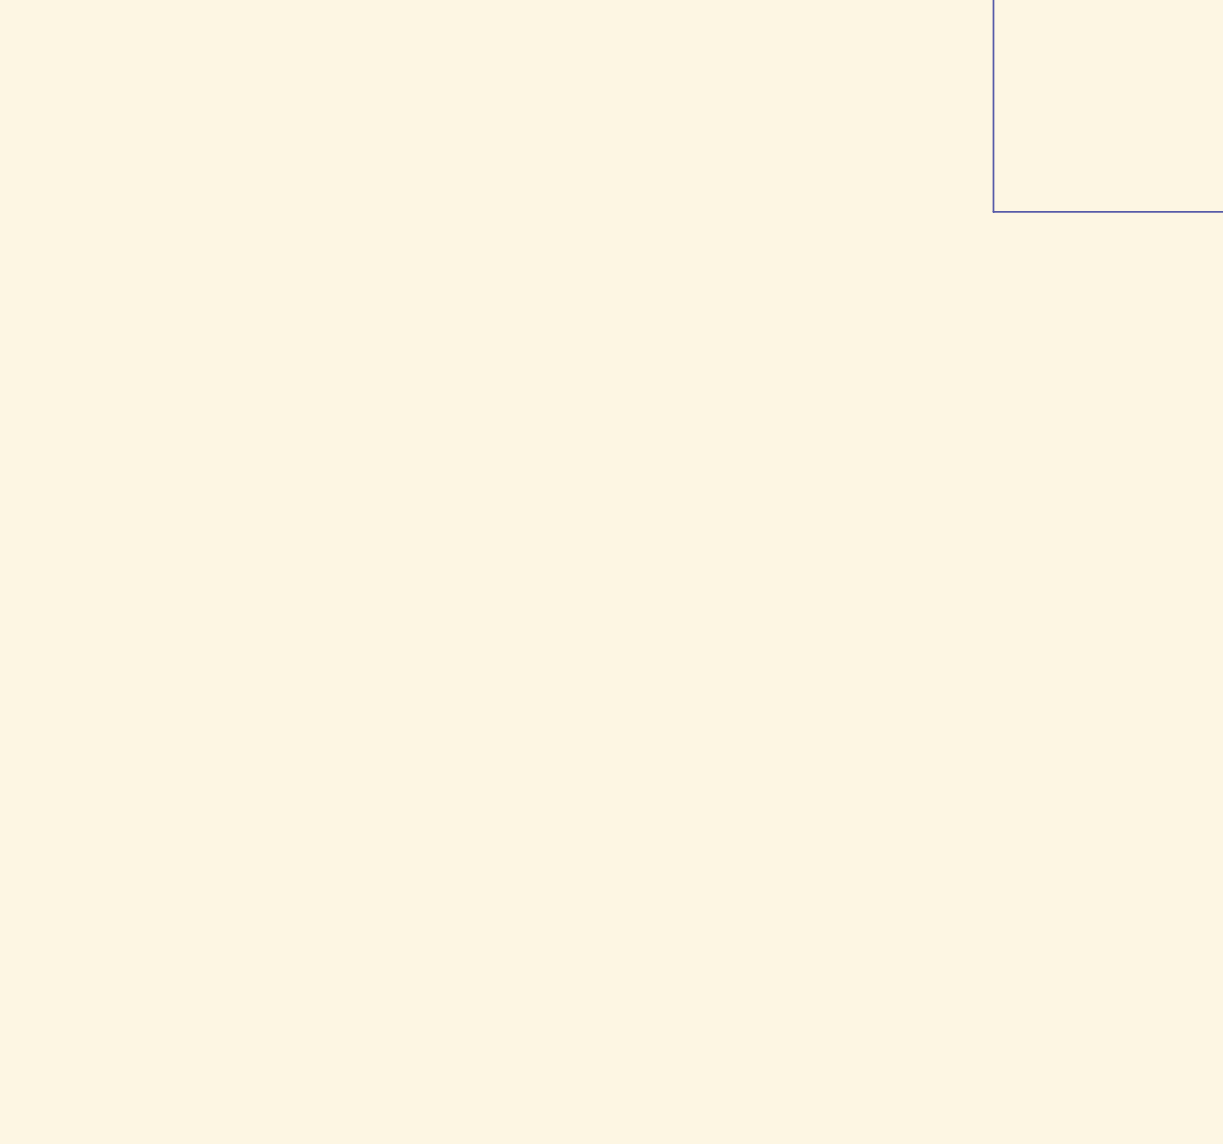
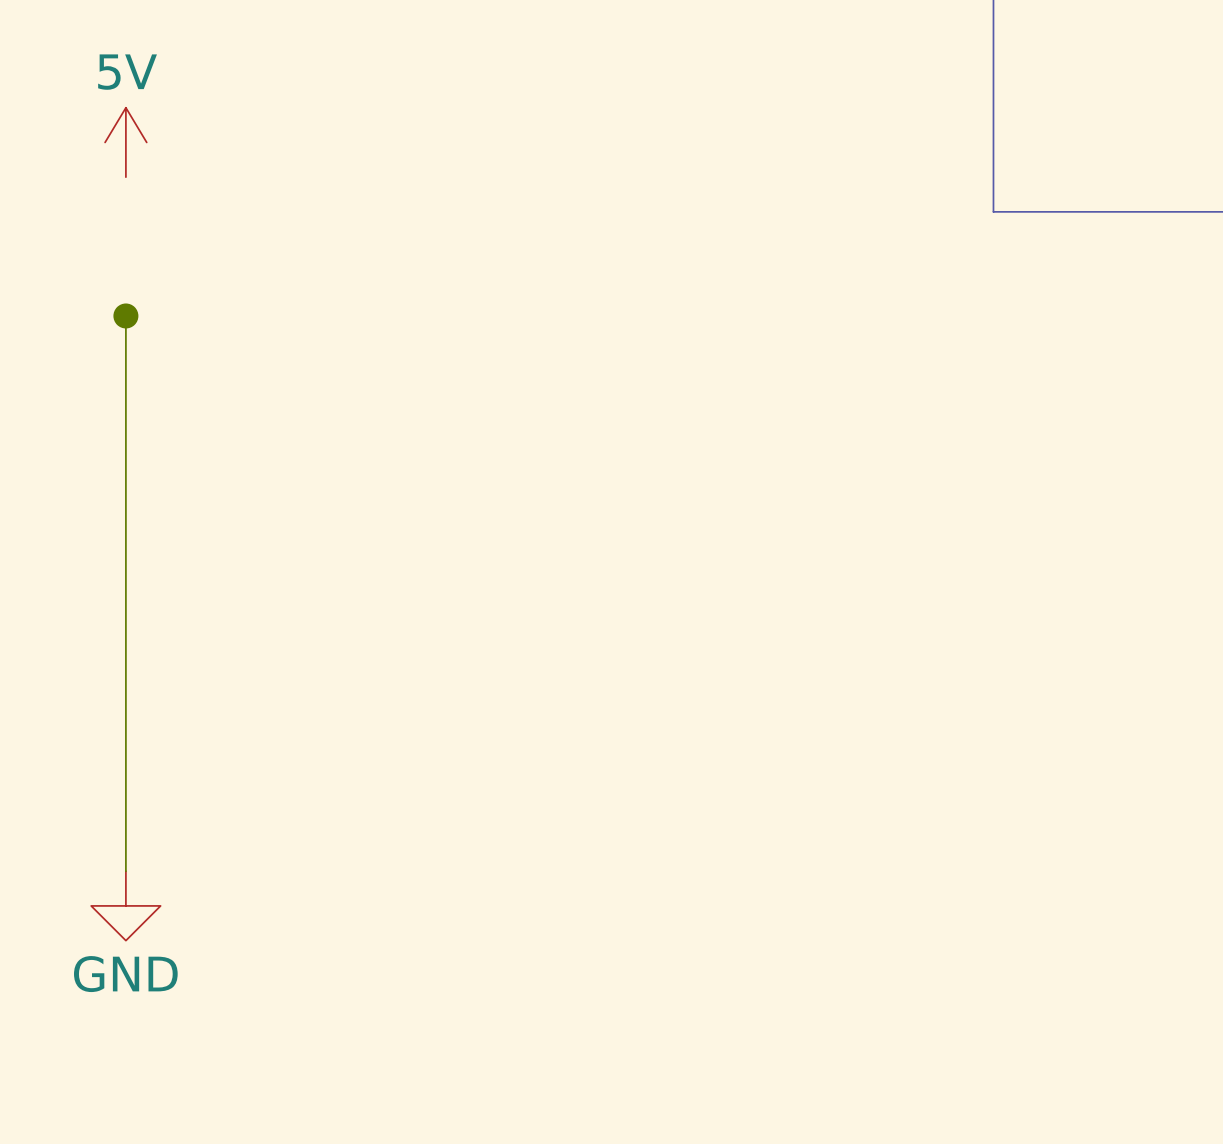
power symbol: none -> 5V (125, 142)
wire: none -> (125, 315) (125, 871)
junction: none -> (125, 315)
power symbol: none -> GND (125, 905)

